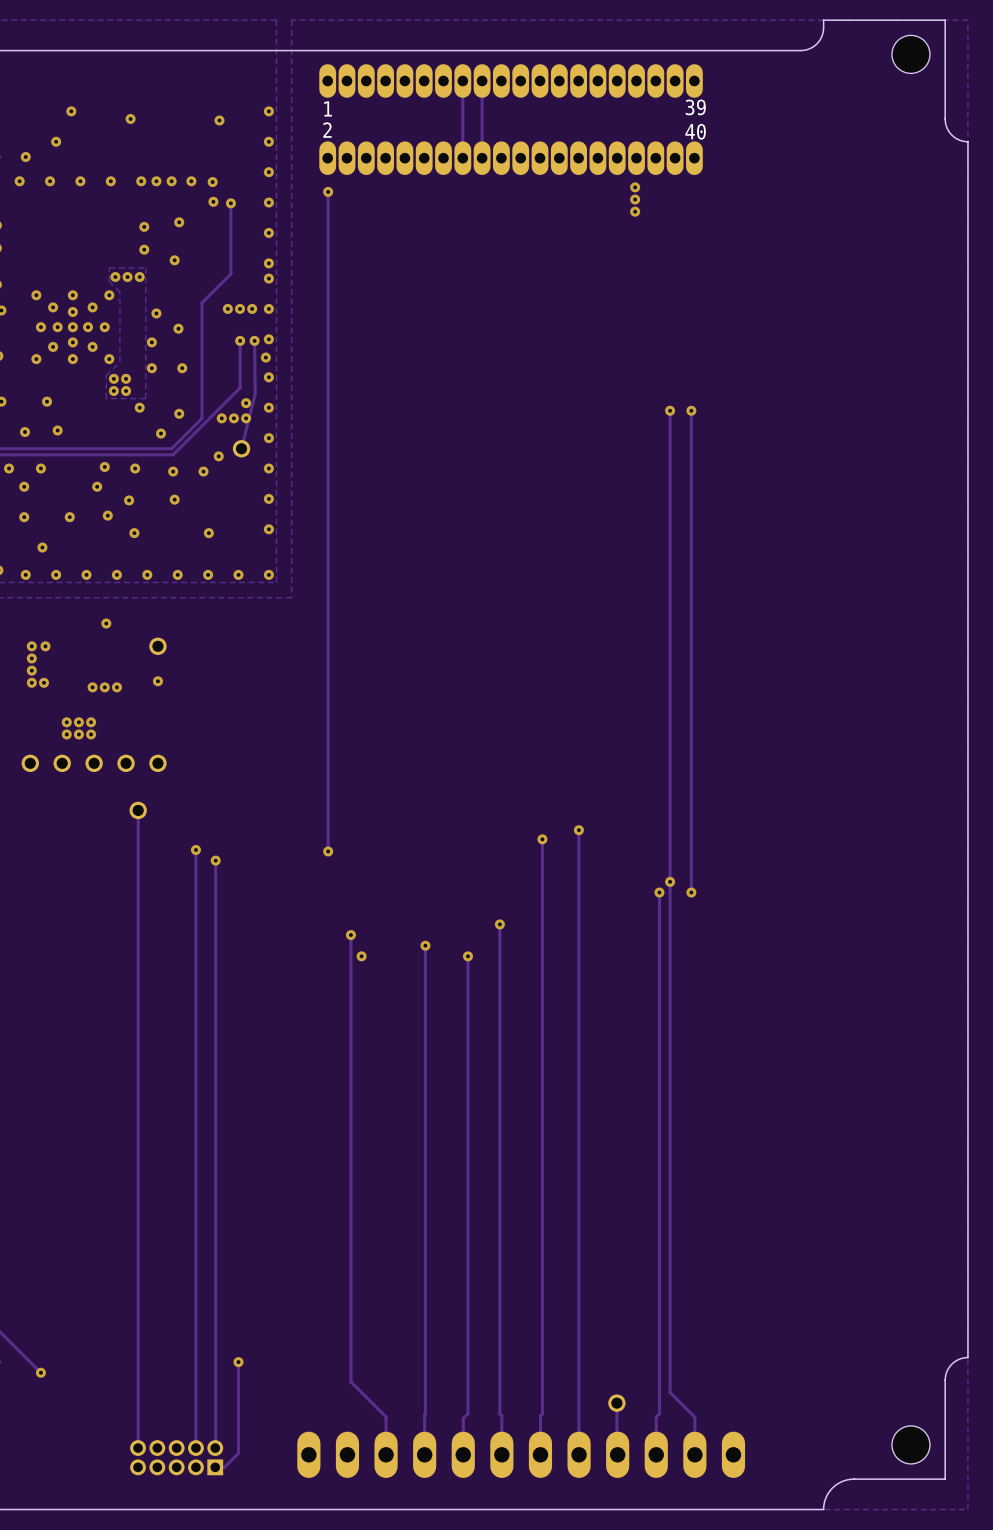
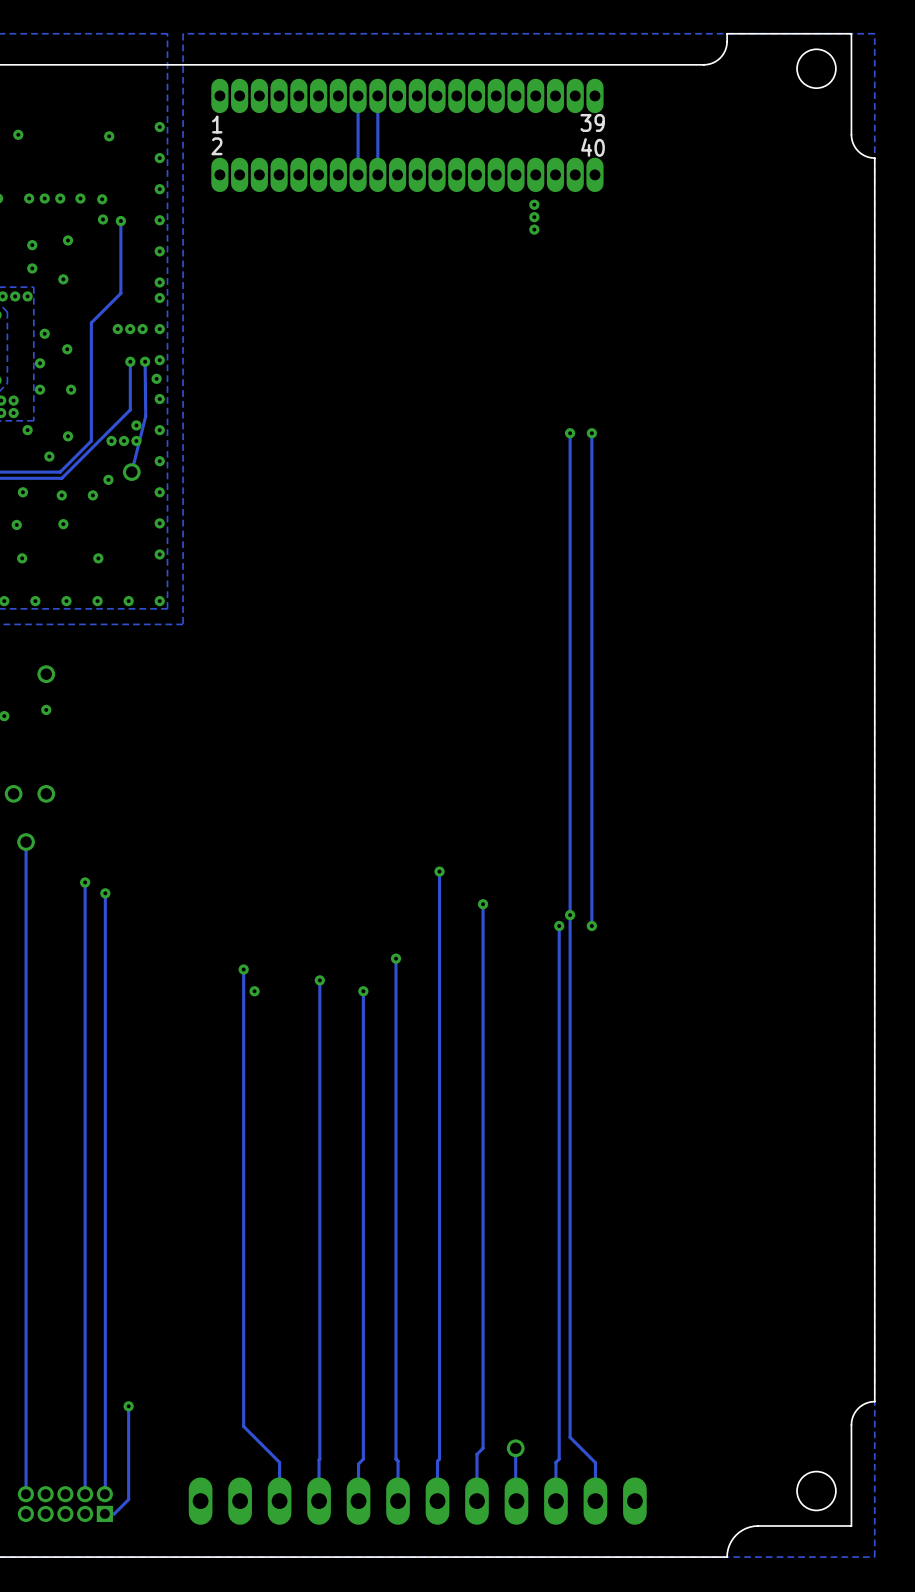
track: (328, 191) (328, 851) -> none
via: (328, 191) -> none
track: (578, 830) (578, 1454) -> (483, 904) (483, 1448) (476, 1454) (476, 1501)
via position: (578, 830) -> (483, 904)
via: (328, 851) -> none

